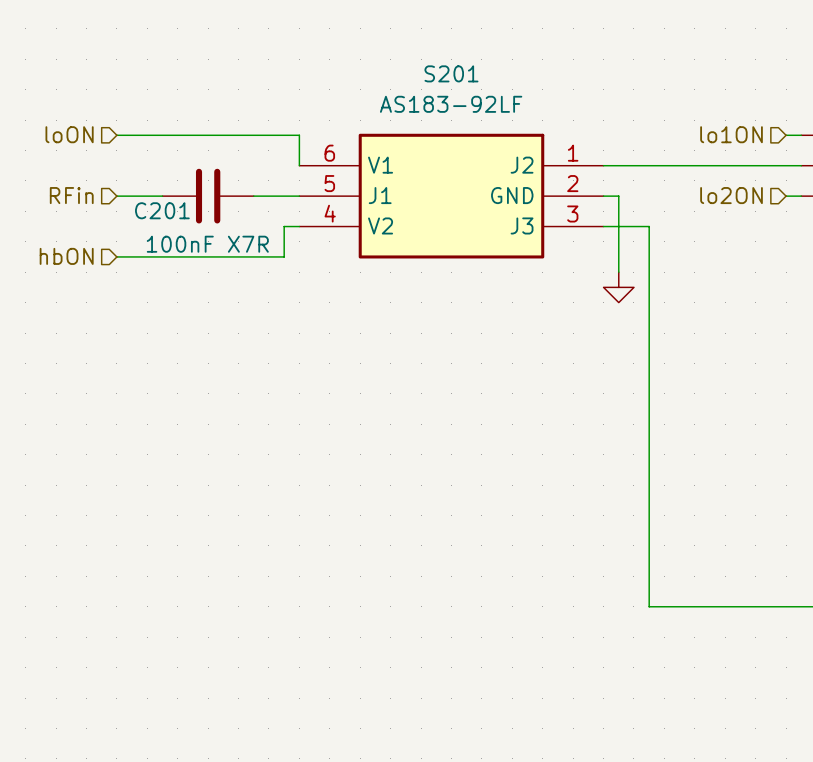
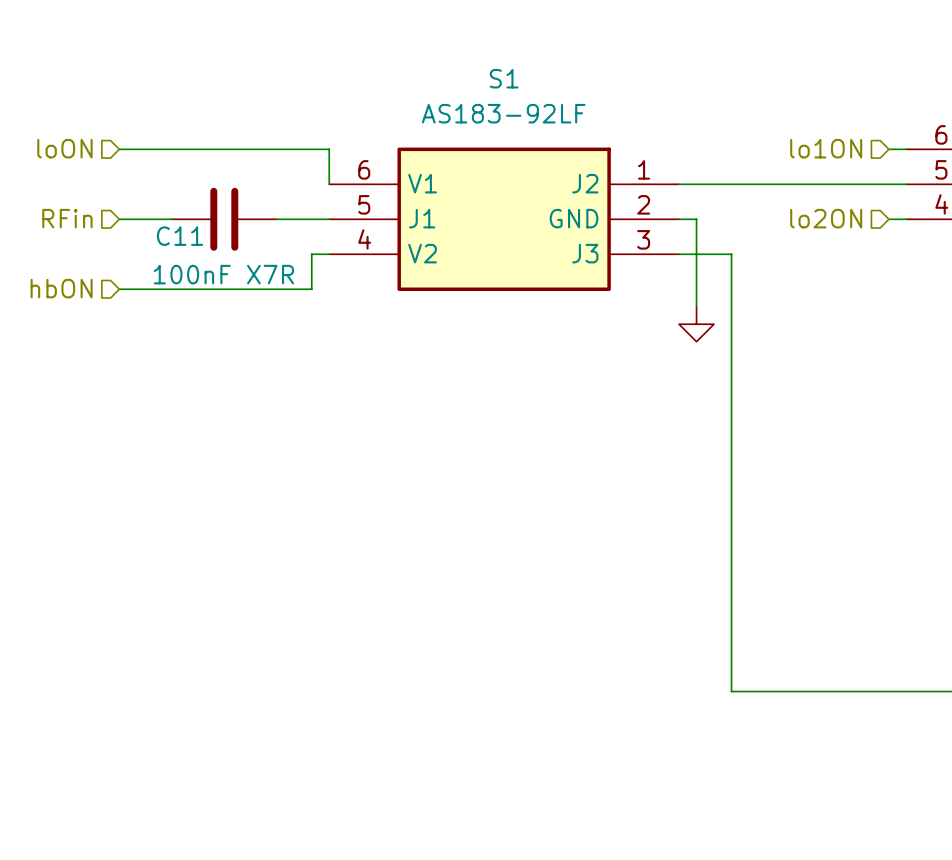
S201 name: S201 (451, 73) -> S1 (504, 78)
C201 name: C201 (162, 210) -> C11 (180, 236)

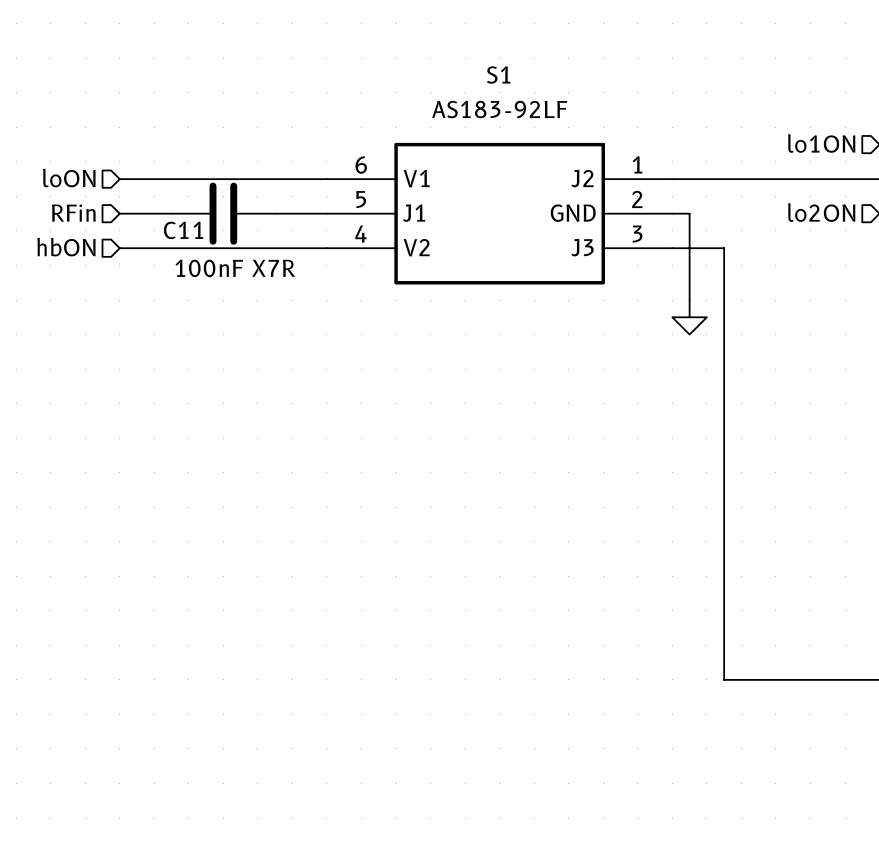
hierarchical label position: loON (64, 148) -> loON (69, 178)
wire: (119, 149) (329, 149) (329, 184) -> (119, 179) (326, 179)
wire: (311, 254) (311, 289) (119, 289) -> (309, 248) (119, 248)
hierarchical label position: hbON (61, 288) -> hbON (66, 247)

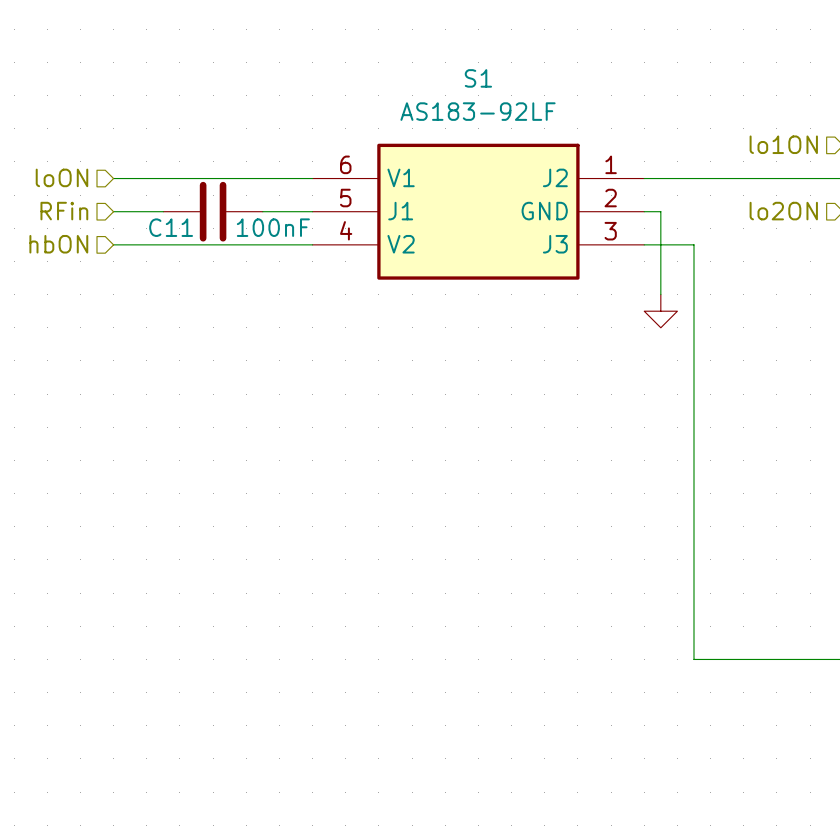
C11 value: 100nF X7R (235, 268) -> 100nF (273, 227)

